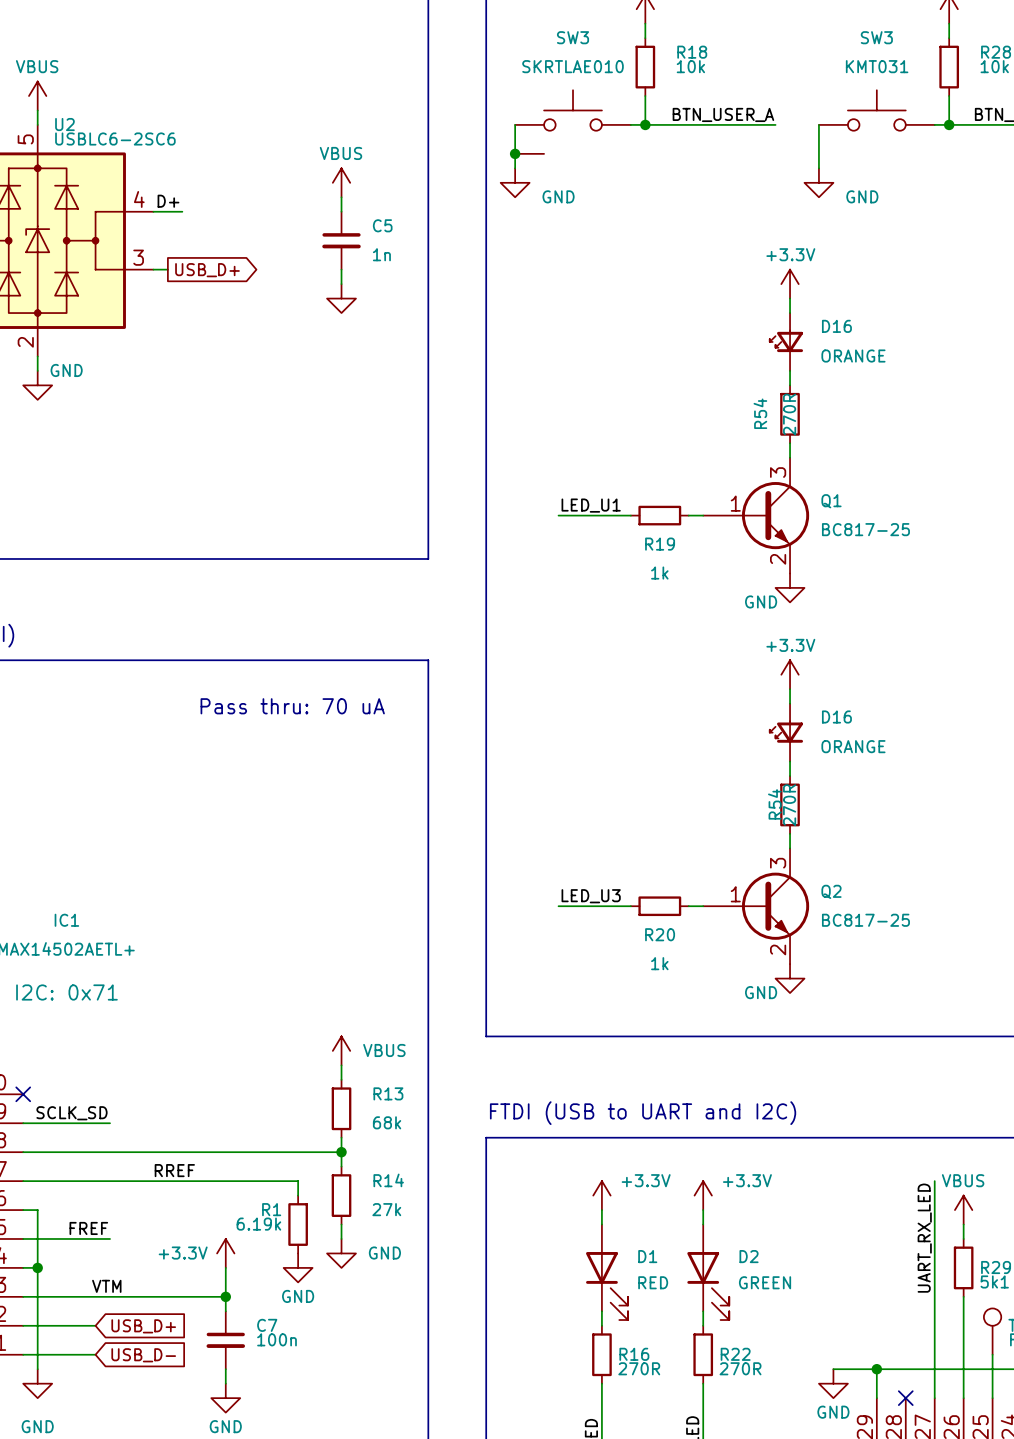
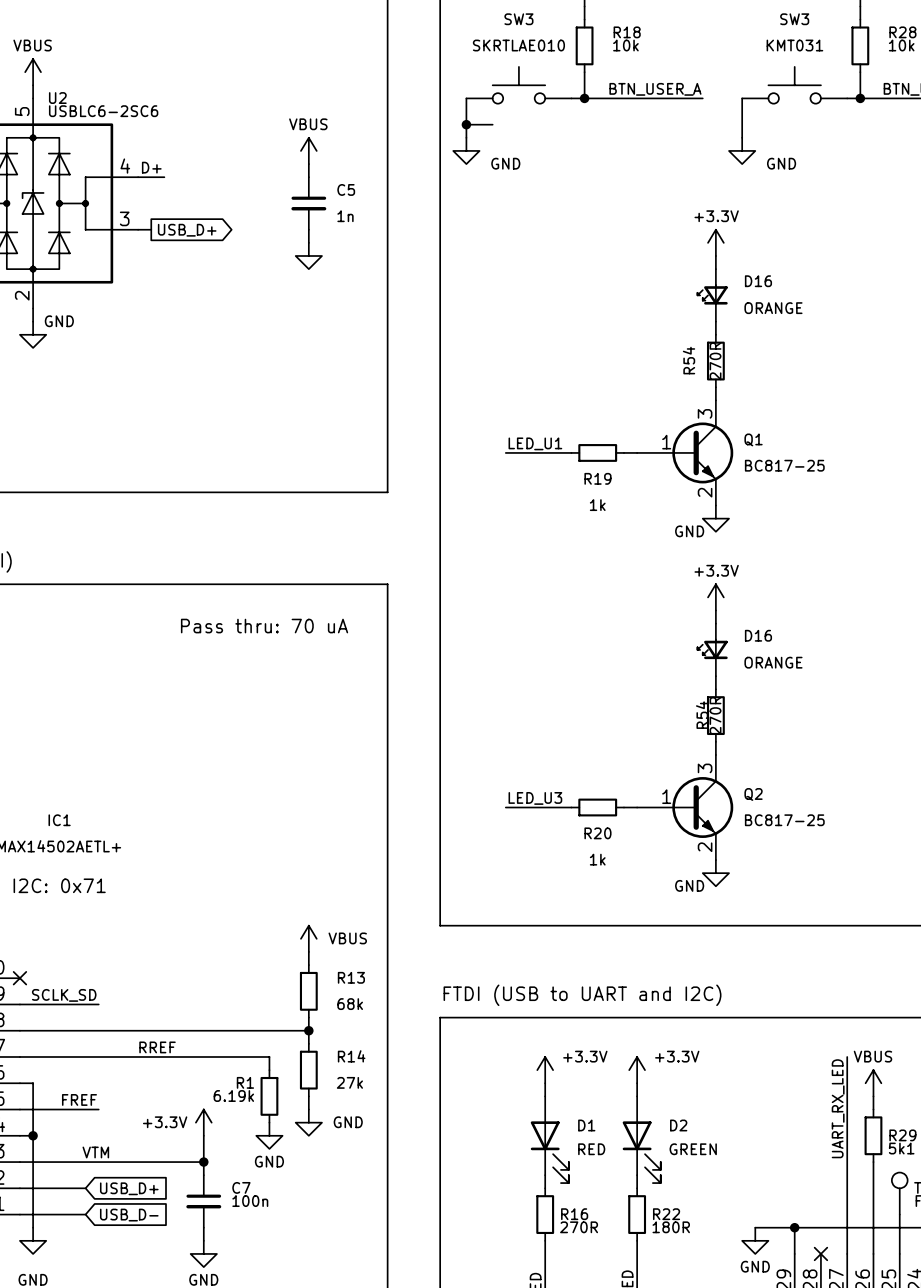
R22 value: 270R (740, 1368) -> 180R (671, 1227)

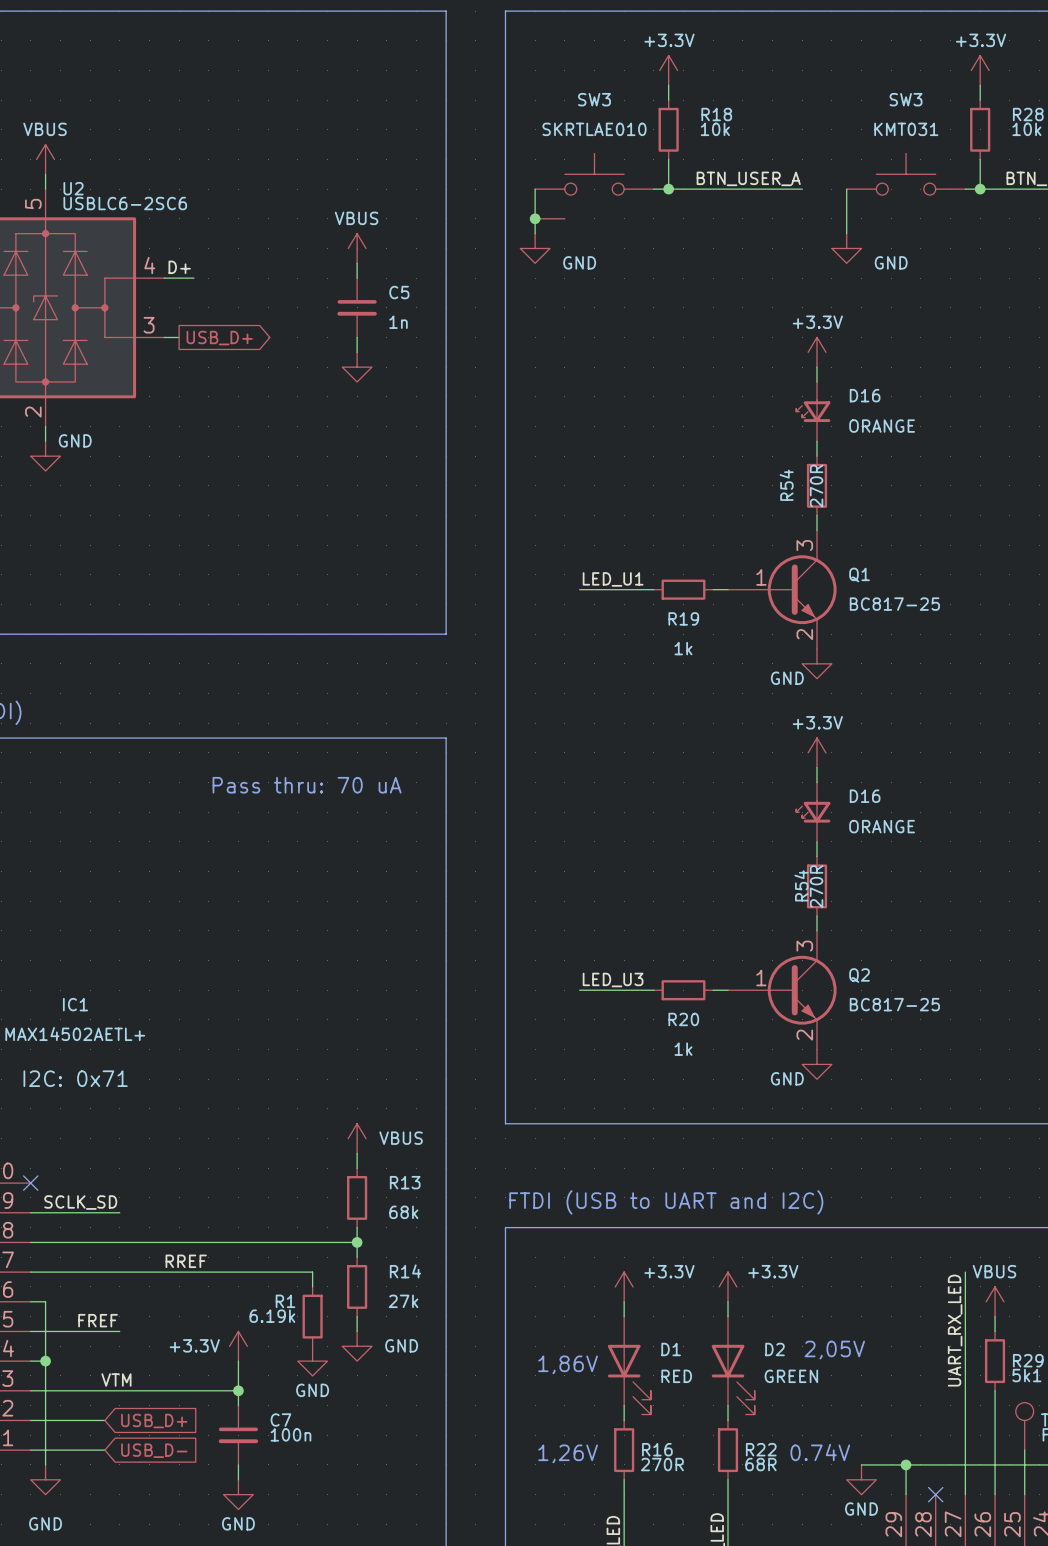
text: none -> 2,05V (834, 1350)
text: none -> 1,86V (568, 1364)
text: none -> 0.74V (820, 1452)
text: none -> 1,26V (568, 1453)
R22 value: 180R (671, 1227) -> 68R (760, 1464)

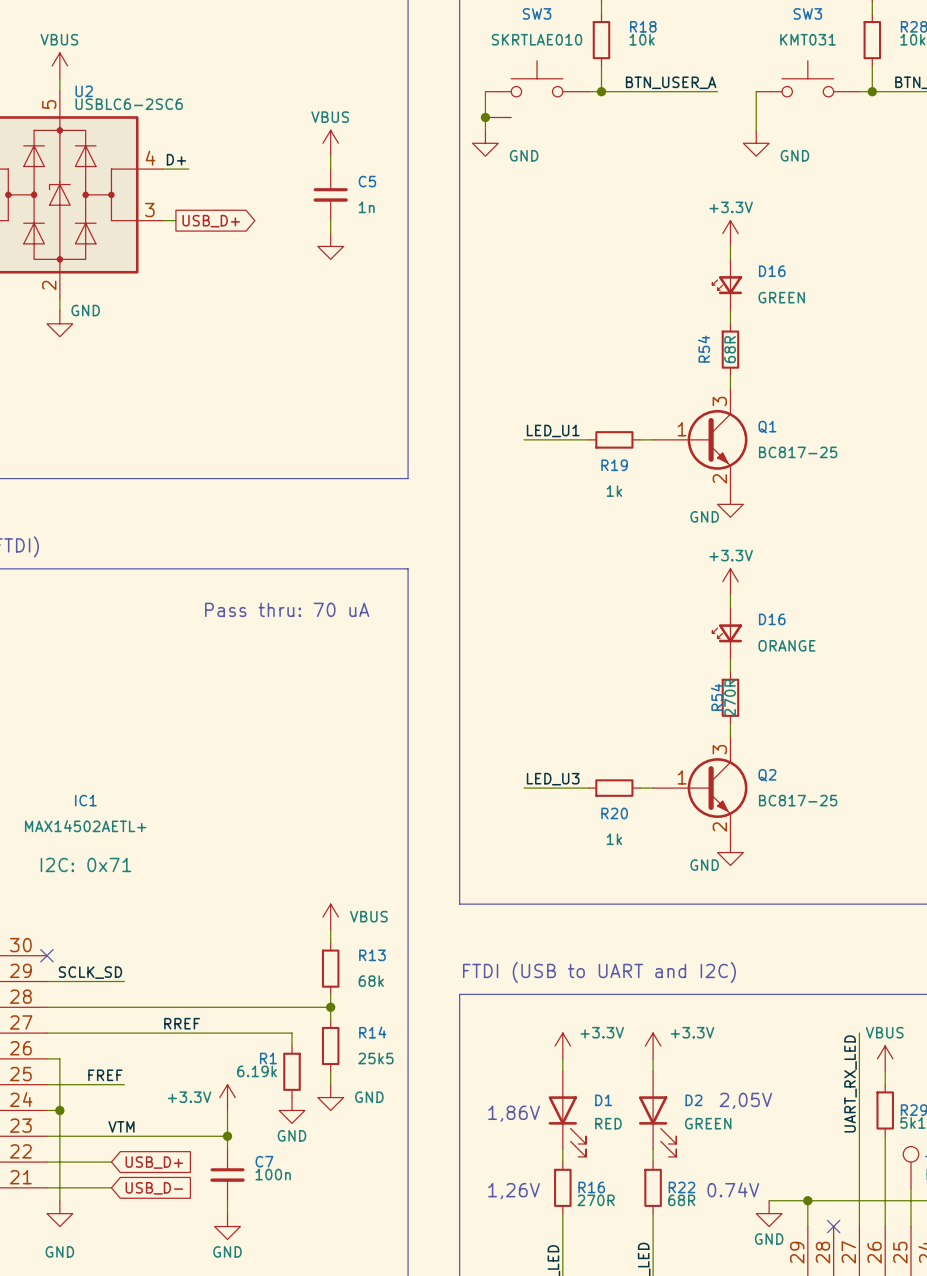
D16 value: ORANGE (882, 426) -> GREEN (781, 297)
R54 value: 270R (816, 486) -> 68R (730, 349)
R14 value: 27k (403, 1301) -> 25k5 (375, 1058)

